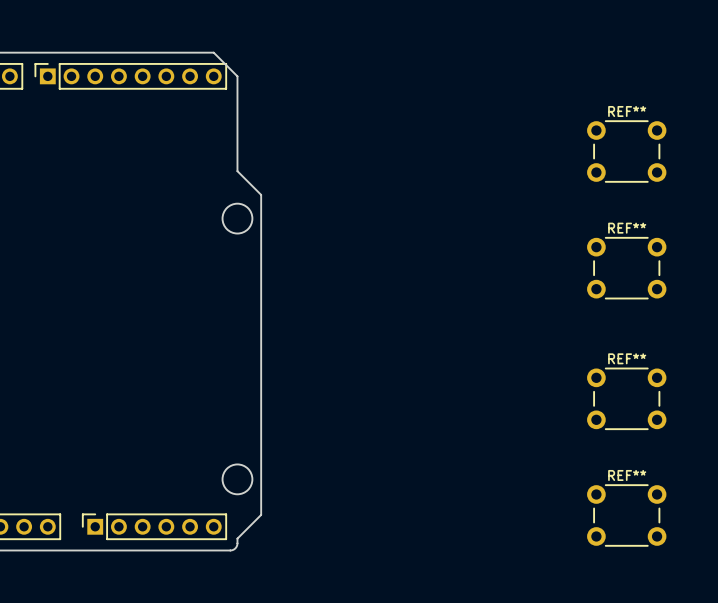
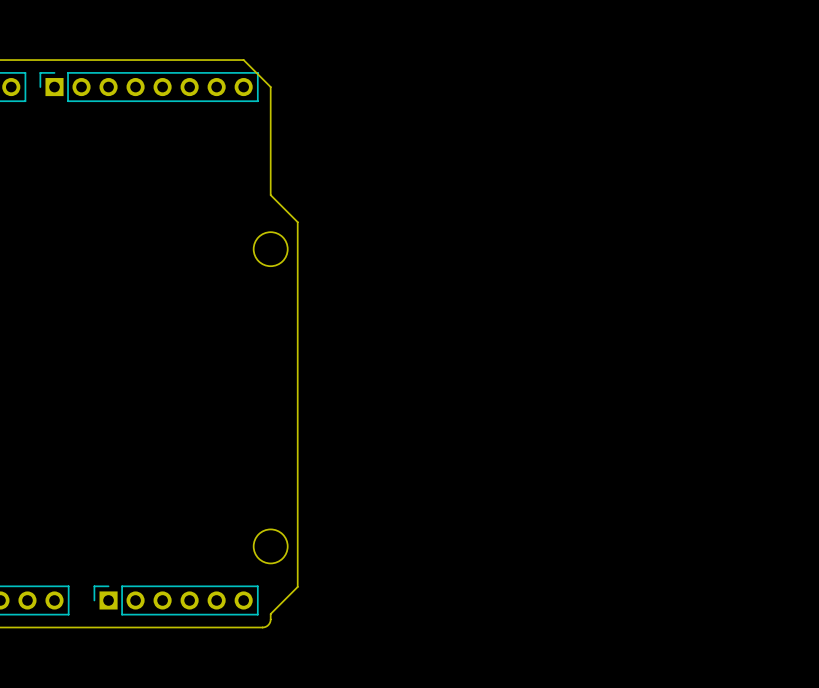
REF**: (626, 151) -> none
REF**: (626, 268) -> none
REF**: (626, 398) -> none
REF**: (626, 515) -> none

